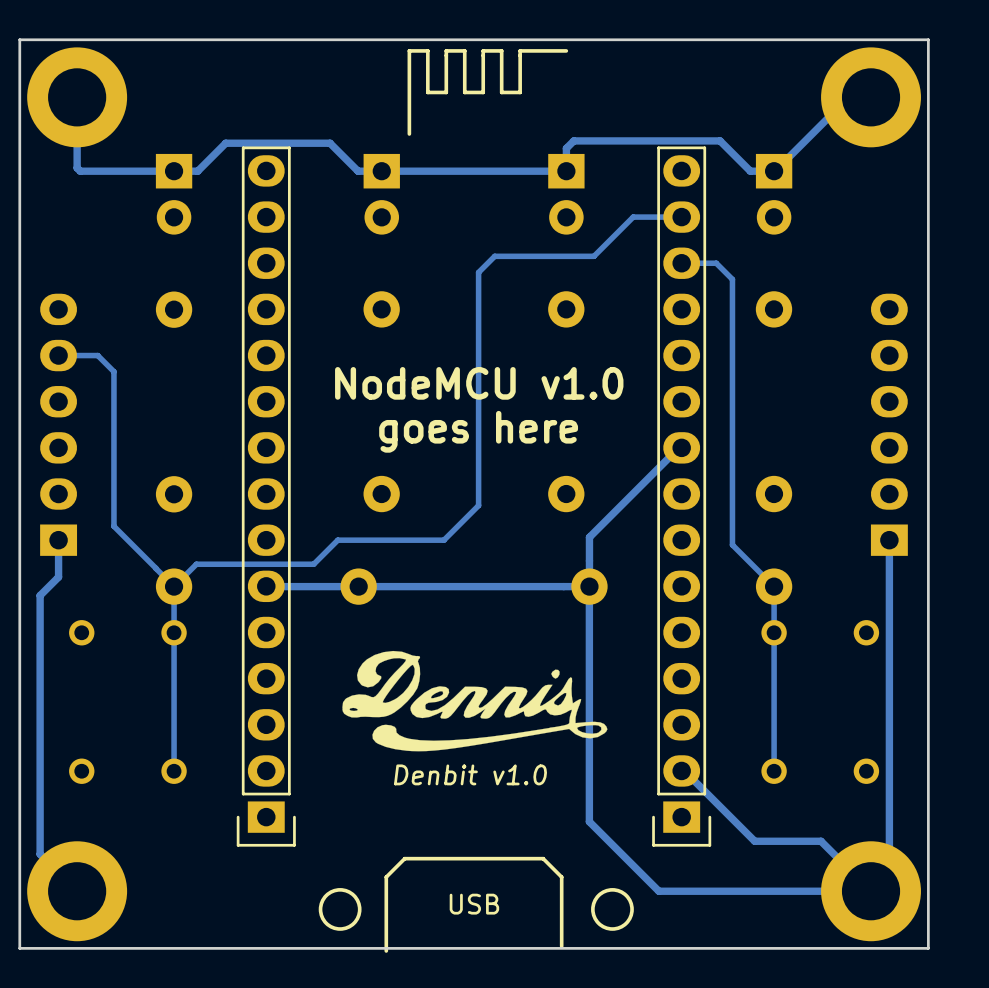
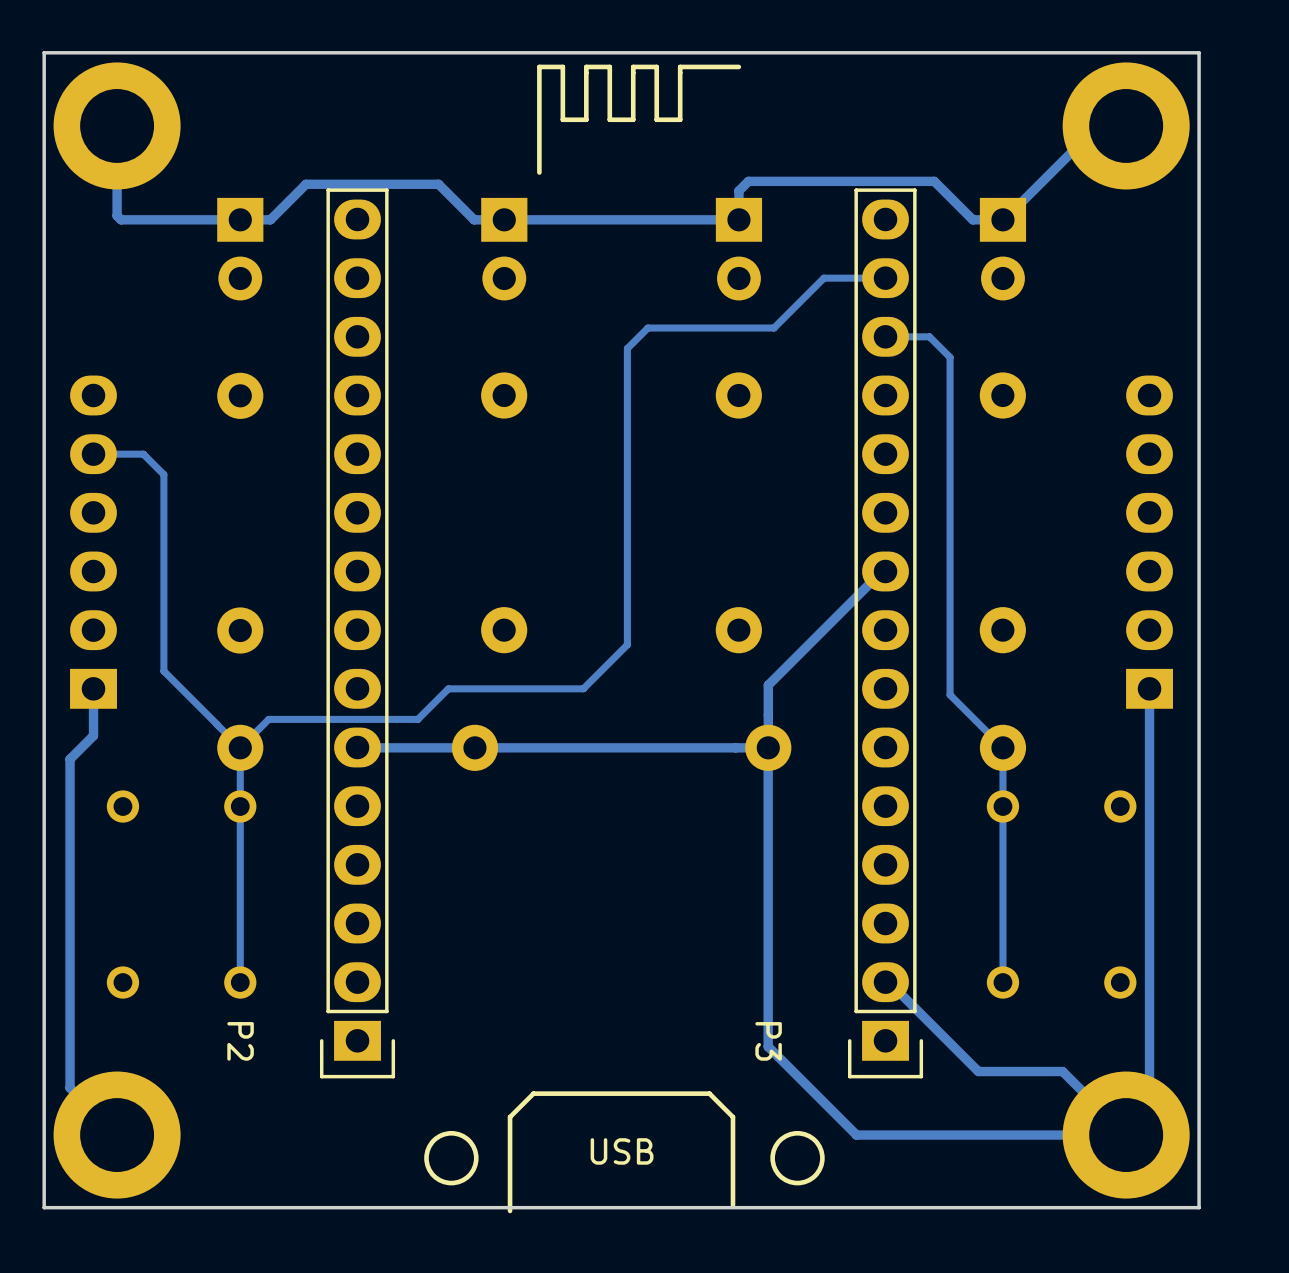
text: NodeMCU v1.0 (479, 383) -> none
text: goes here (478, 431) -> none
drawing: [342, 650, 608, 752] -> none
text: Denbit v1.0 (470, 774) -> none
P2 name: none -> P2 (240, 1041)
P3 name: none -> P3 (768, 1041)

